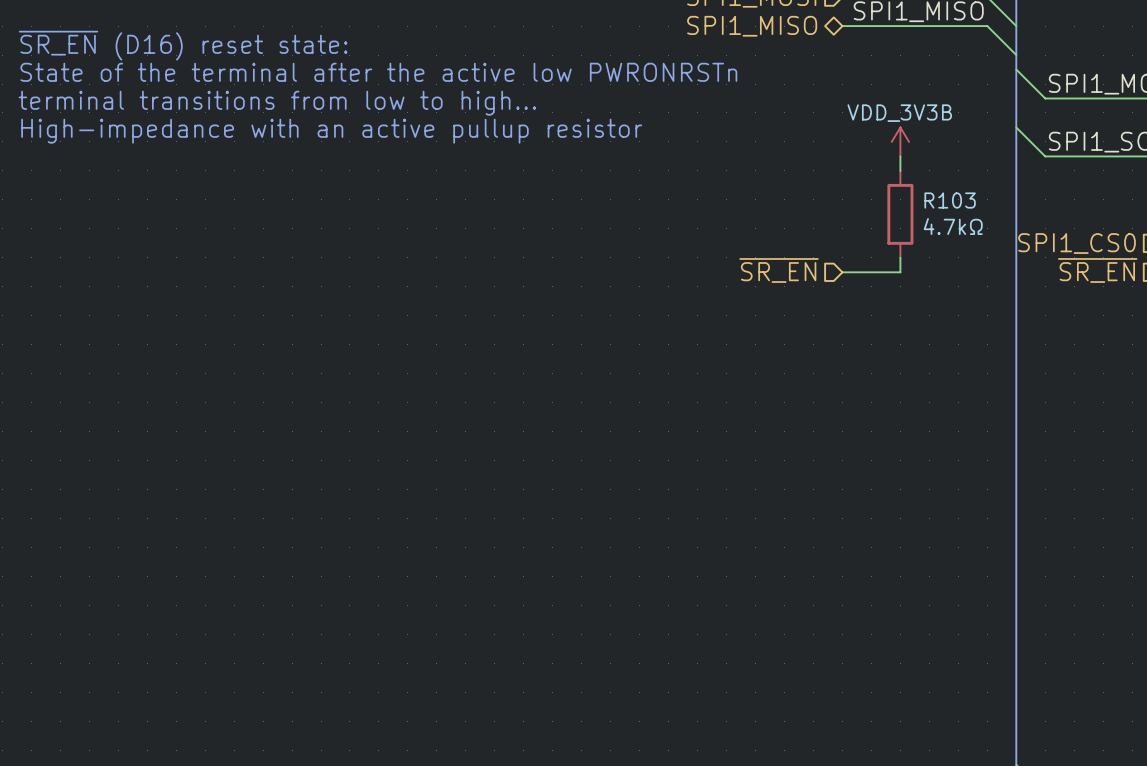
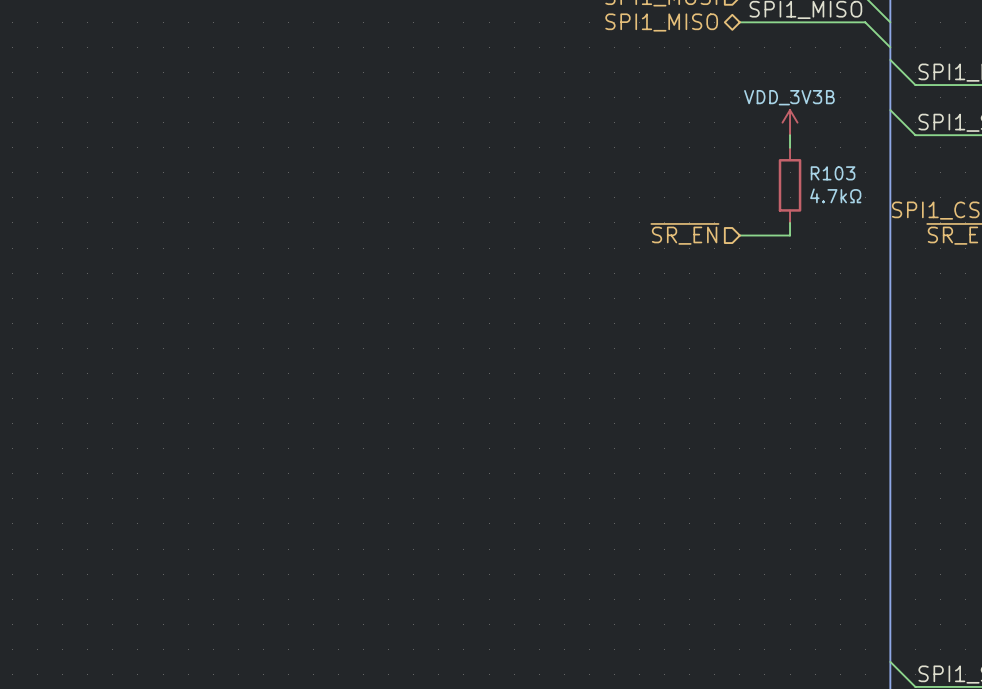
text: ~{SR_EN} (D16) reset state: (183, 45) -> none
text: State of the terminal after the active low PWRONRSTn (378, 72) -> none
text: terminal transitions from low to high... (277, 103) -> none
text: High-impedance with an active pullup resistor (331, 131) -> none

